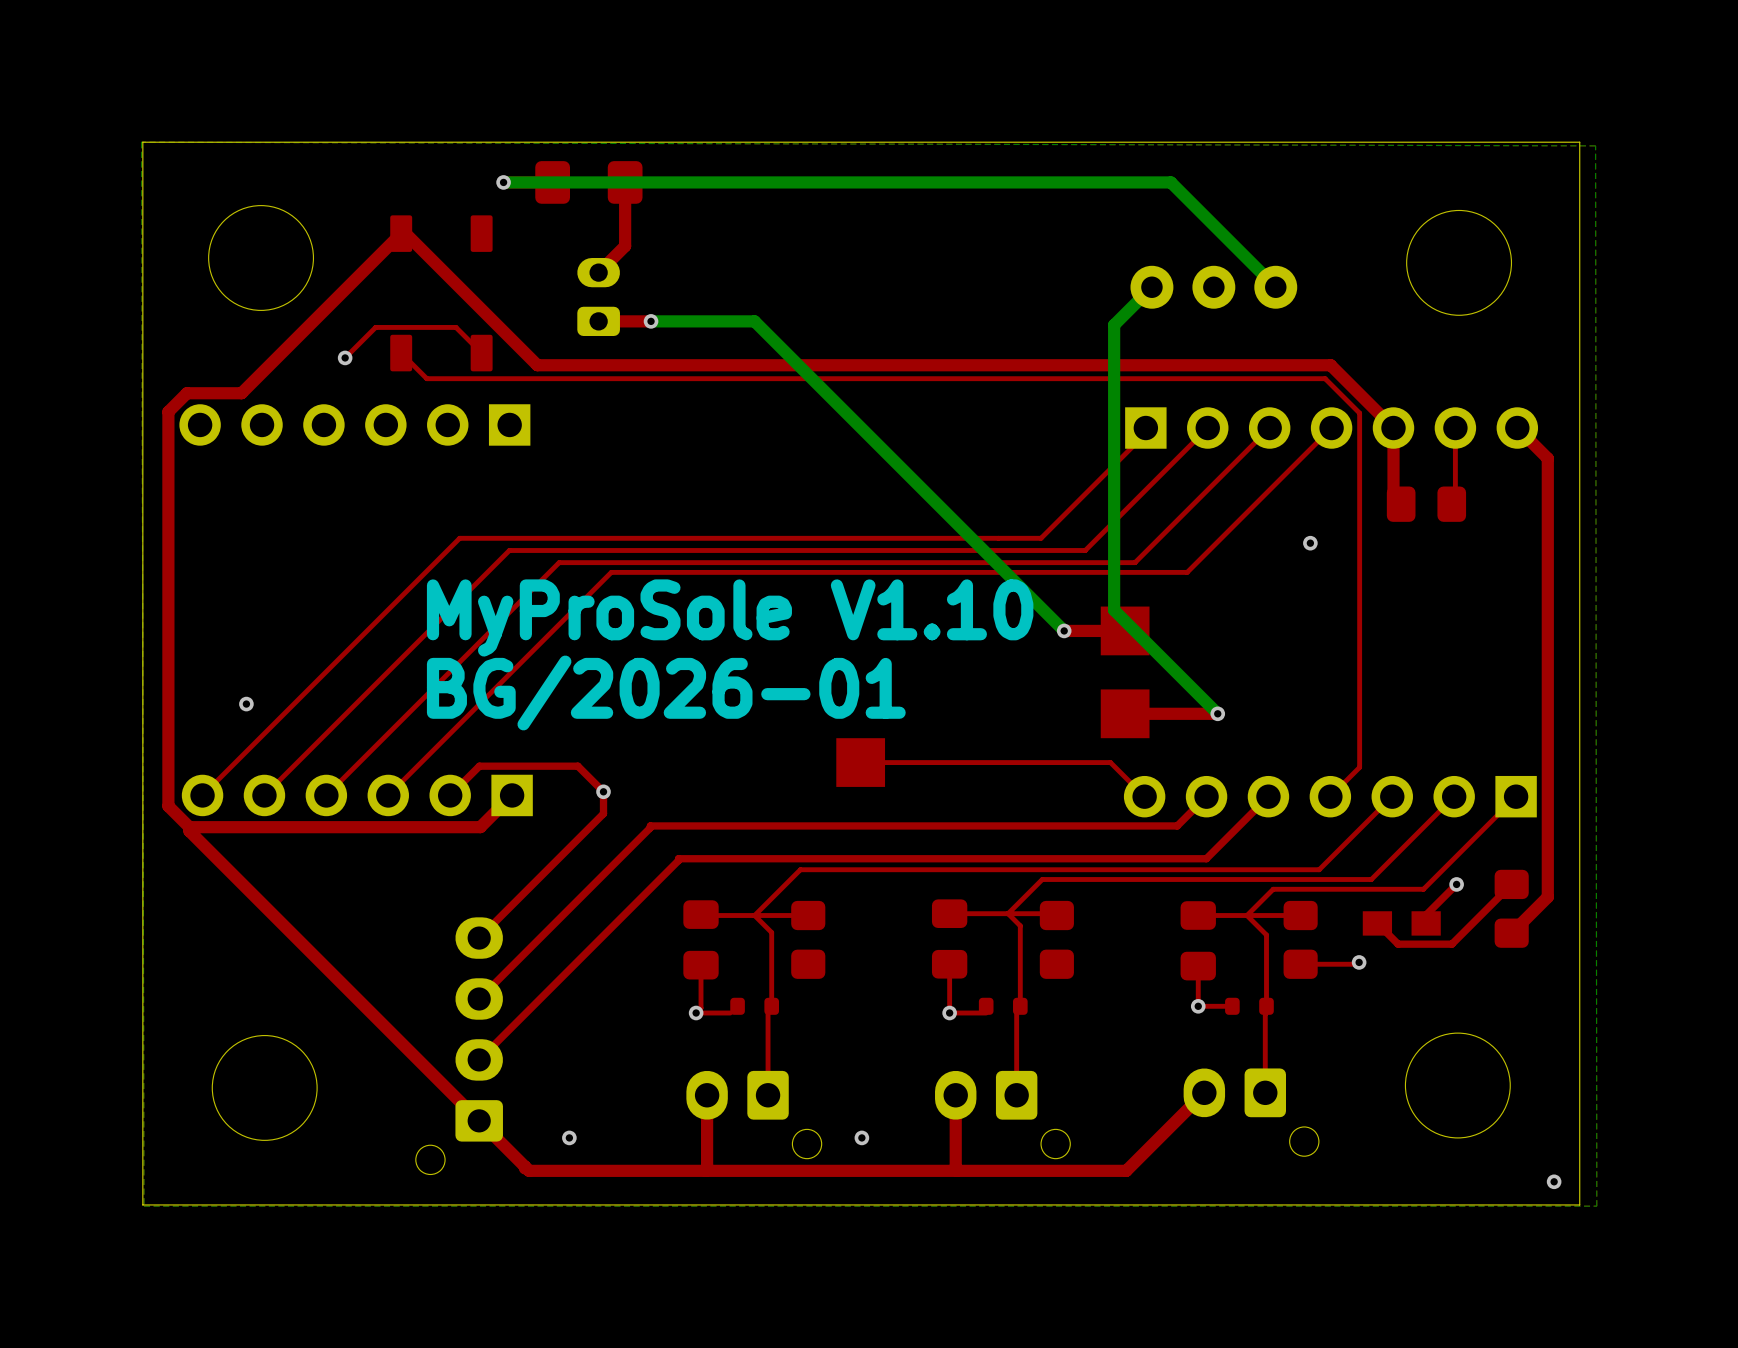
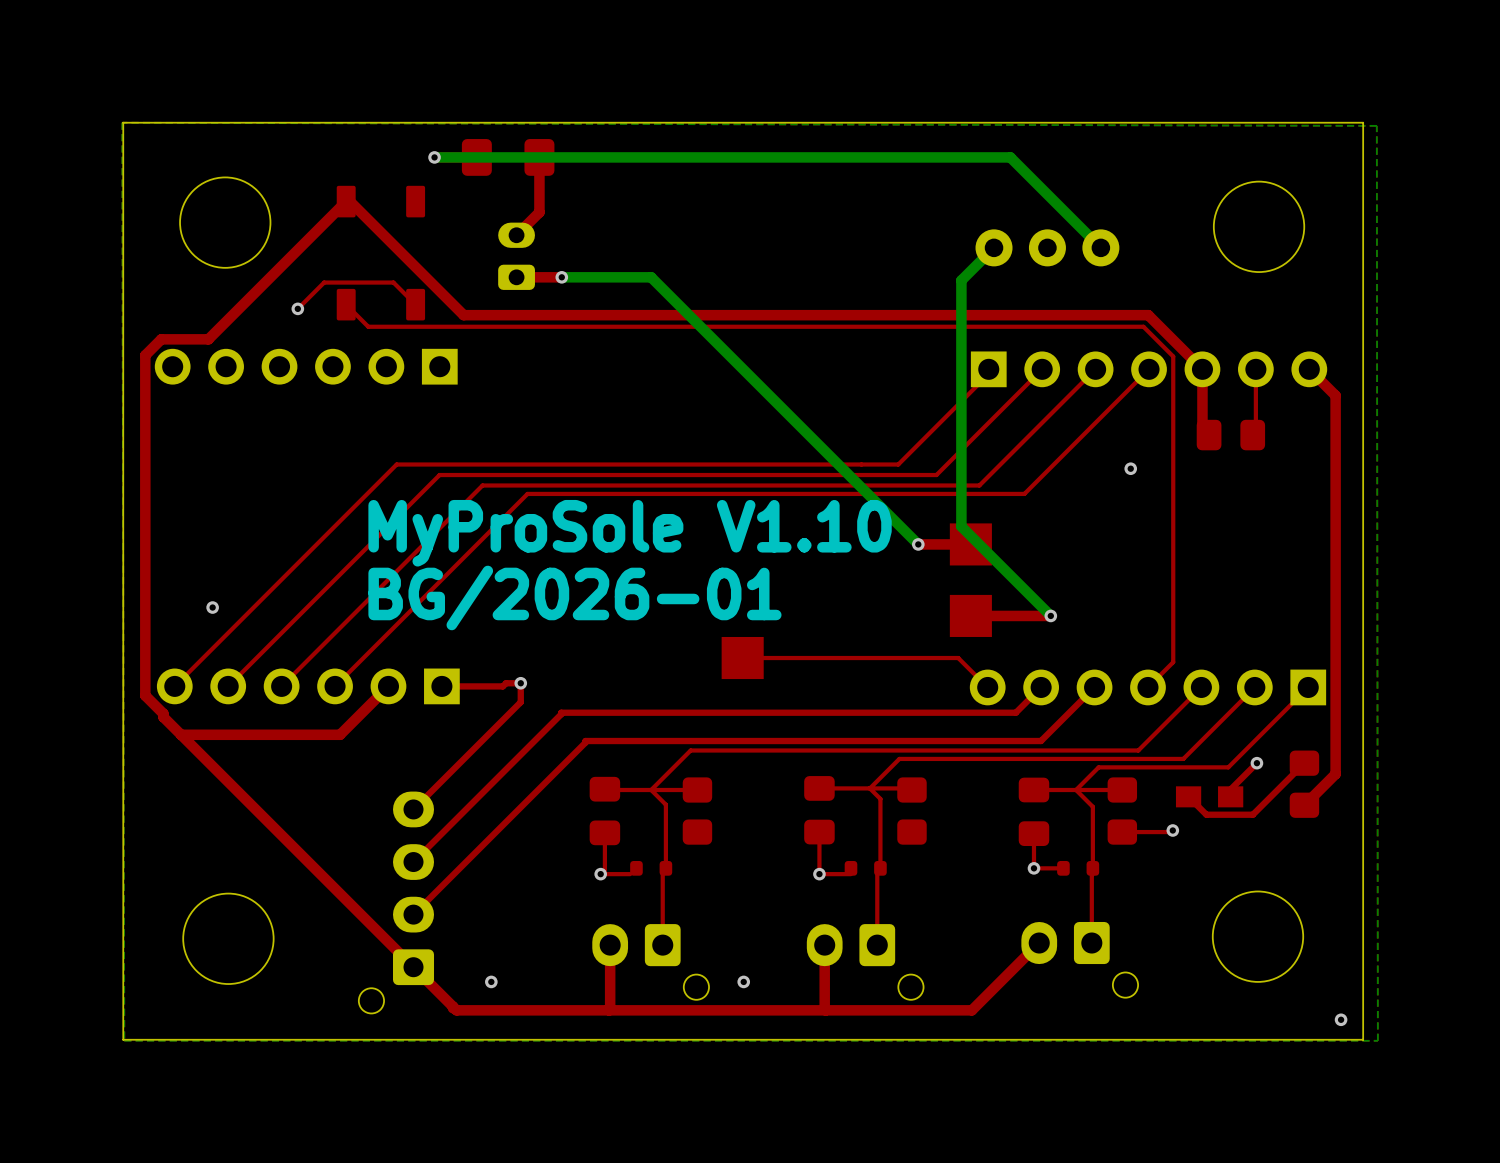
top track: (603, 791) (577, 766) (479, 766) (450, 795) -> (520, 683) (506, 683) (502, 686) (441, 686)
top track: none -> (388, 686) (340, 734) (181, 734)
top track: (512, 795) (480, 827) (189, 827) -> none

